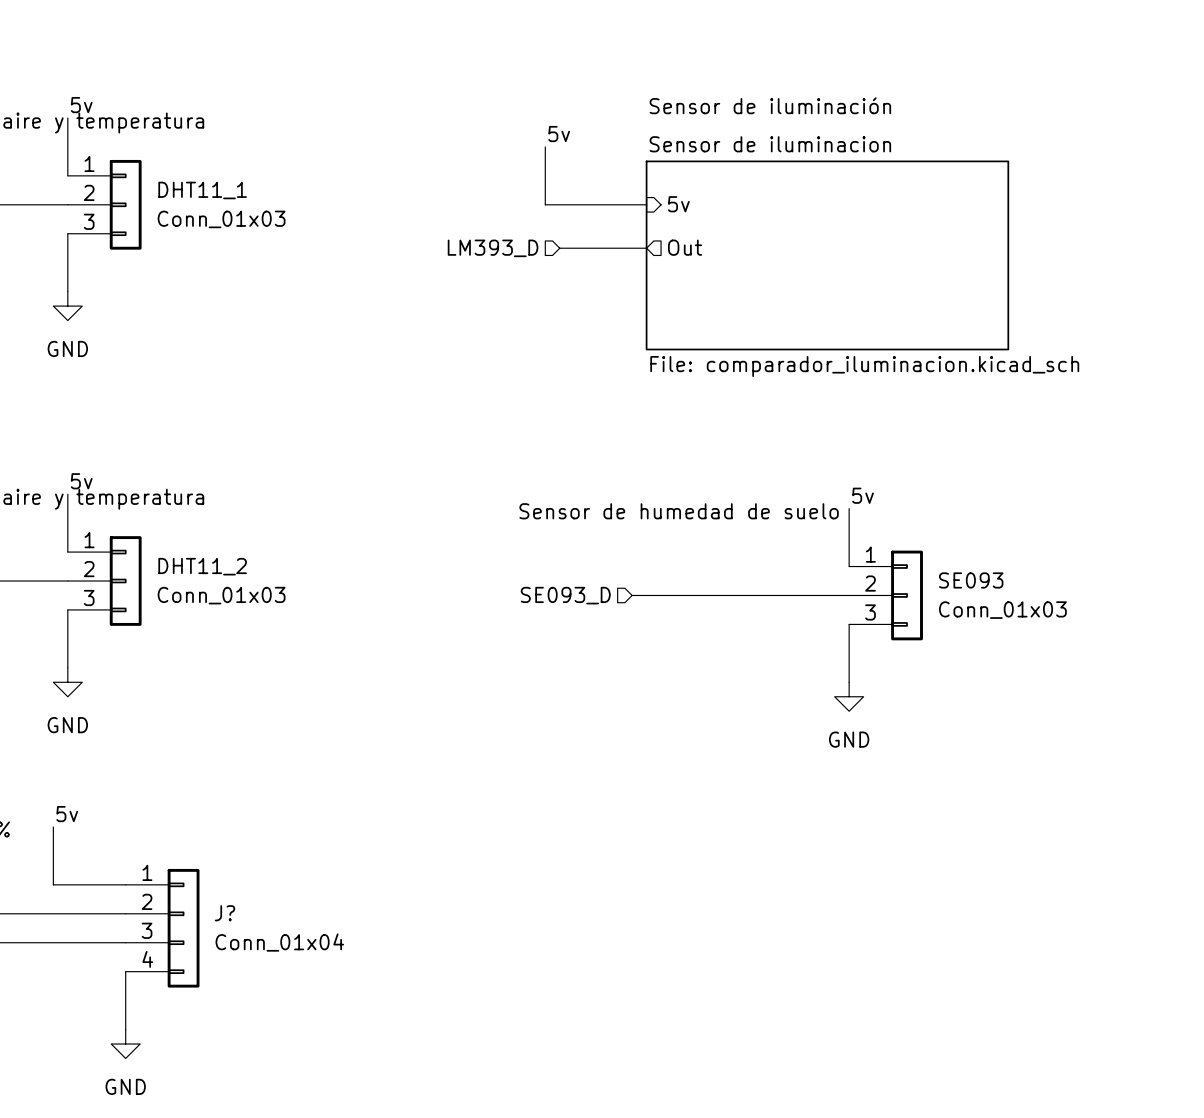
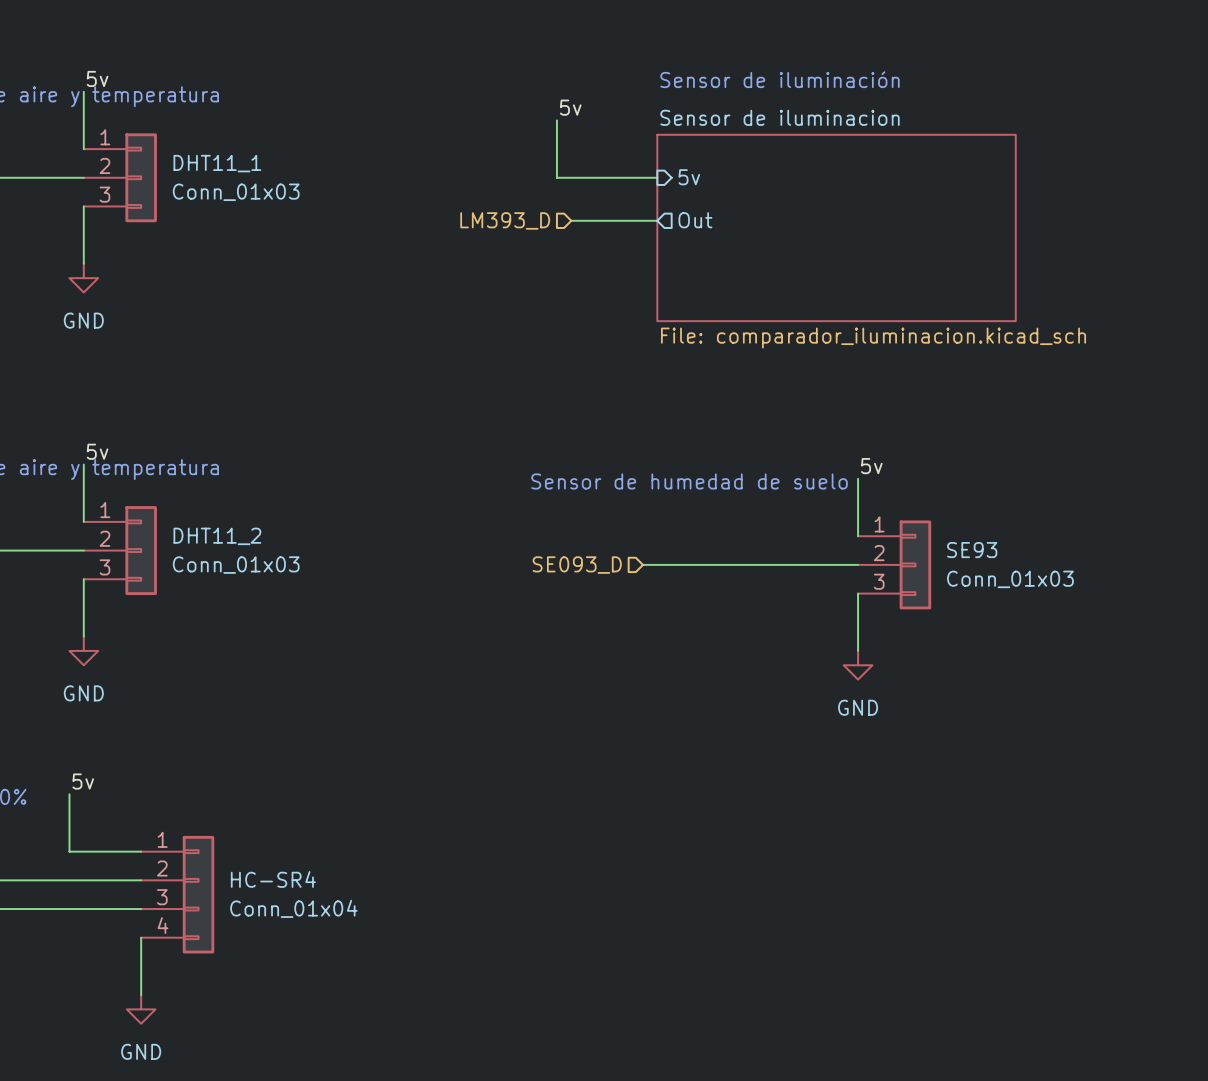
SE093 name: SE093 (971, 580) -> SE93 (972, 550)
J? name: J? (225, 913) -> HC-SR4 (273, 879)

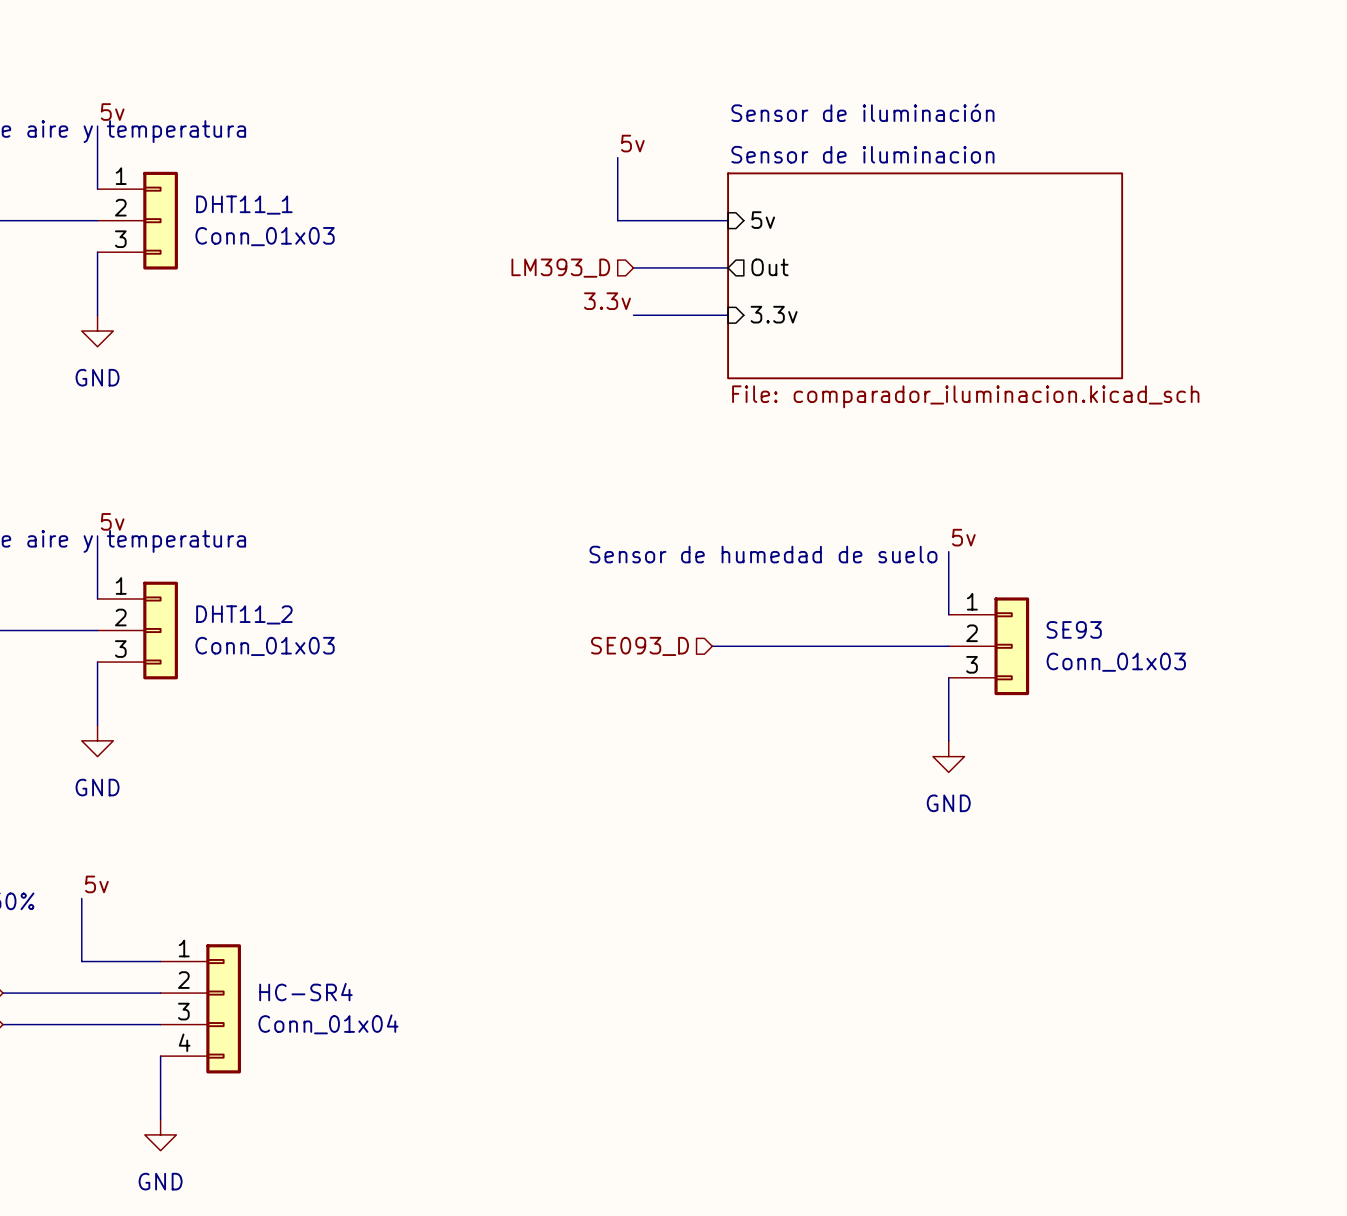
label: none -> 3.3v (607, 301)
wire: none -> (633, 315) (728, 315)
sheet pin: none -> 3.3v (774, 314)

